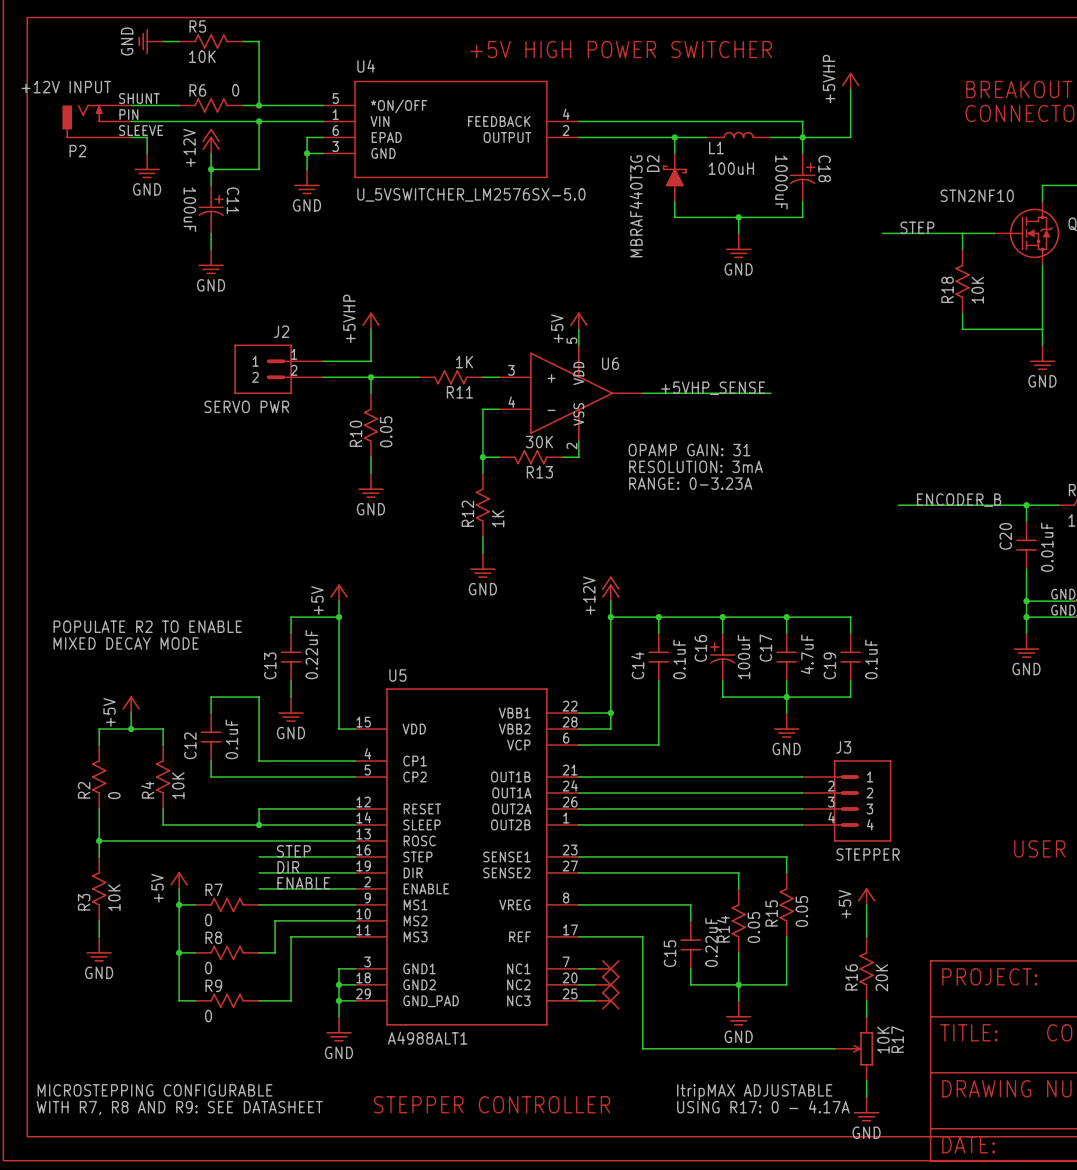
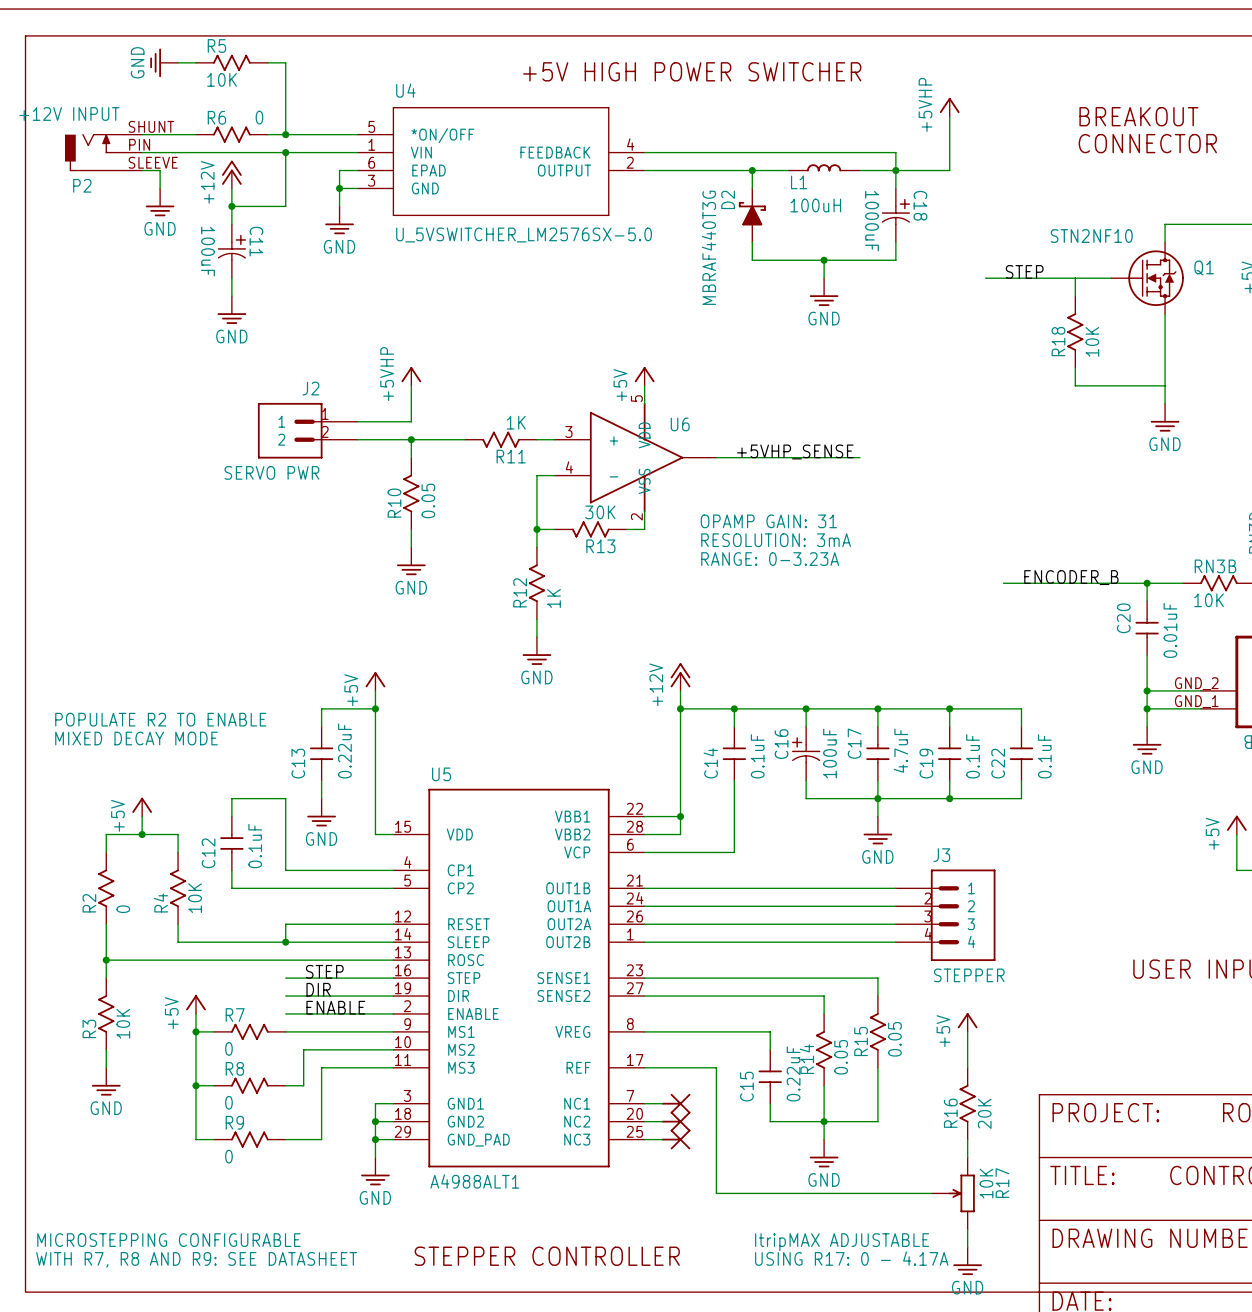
wire: none -> (949, 708) (1021, 708) (1021, 726)
junction: none -> (949, 708)
C22: none -> 0.1uF (1021, 753)
wire: none -> (1021, 780) (1021, 798) (949, 798)
junction: none -> (949, 798)

